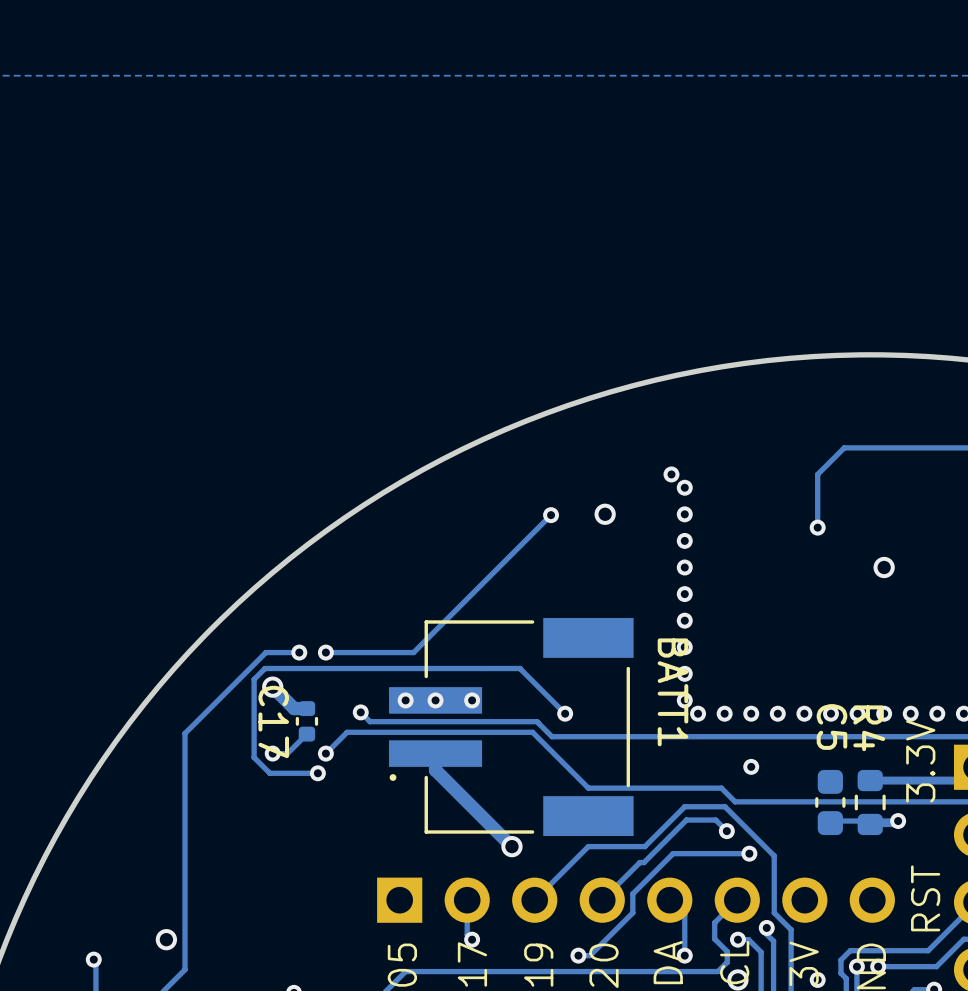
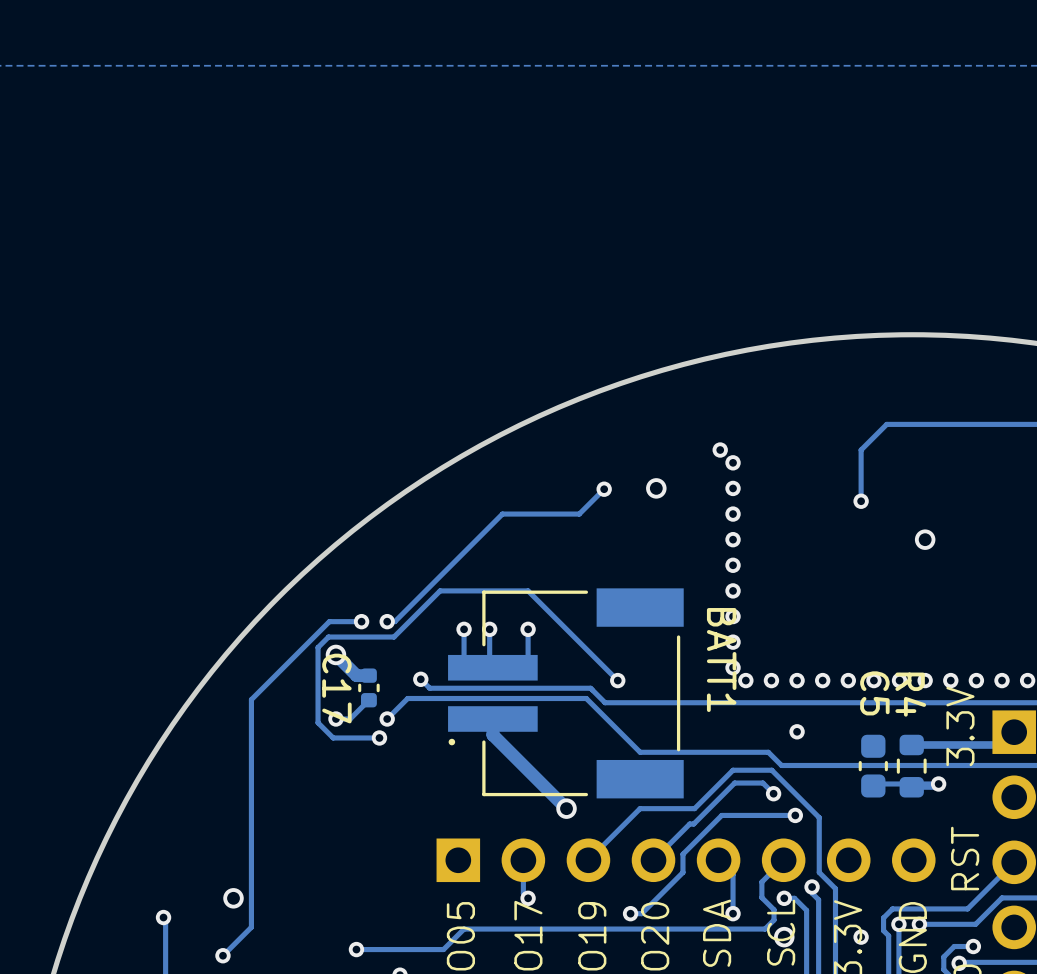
track: (525, 540) (413, 652) (333, 652) -> (579, 514) (502, 514) (394, 621)
track: none -> (464, 629) (464, 666)
via: none -> (464, 629)
track: none -> (489, 629) (489, 665)
via: none -> (489, 629)
track: none -> (528, 629) (528, 665)
via: none -> (528, 629)
track: (519, 668) (332, 668) -> (574, 637) (528, 590) (440, 590) (394, 637)
via: (405, 700) -> none
via: (435, 700) -> none
via: (472, 700) -> none

